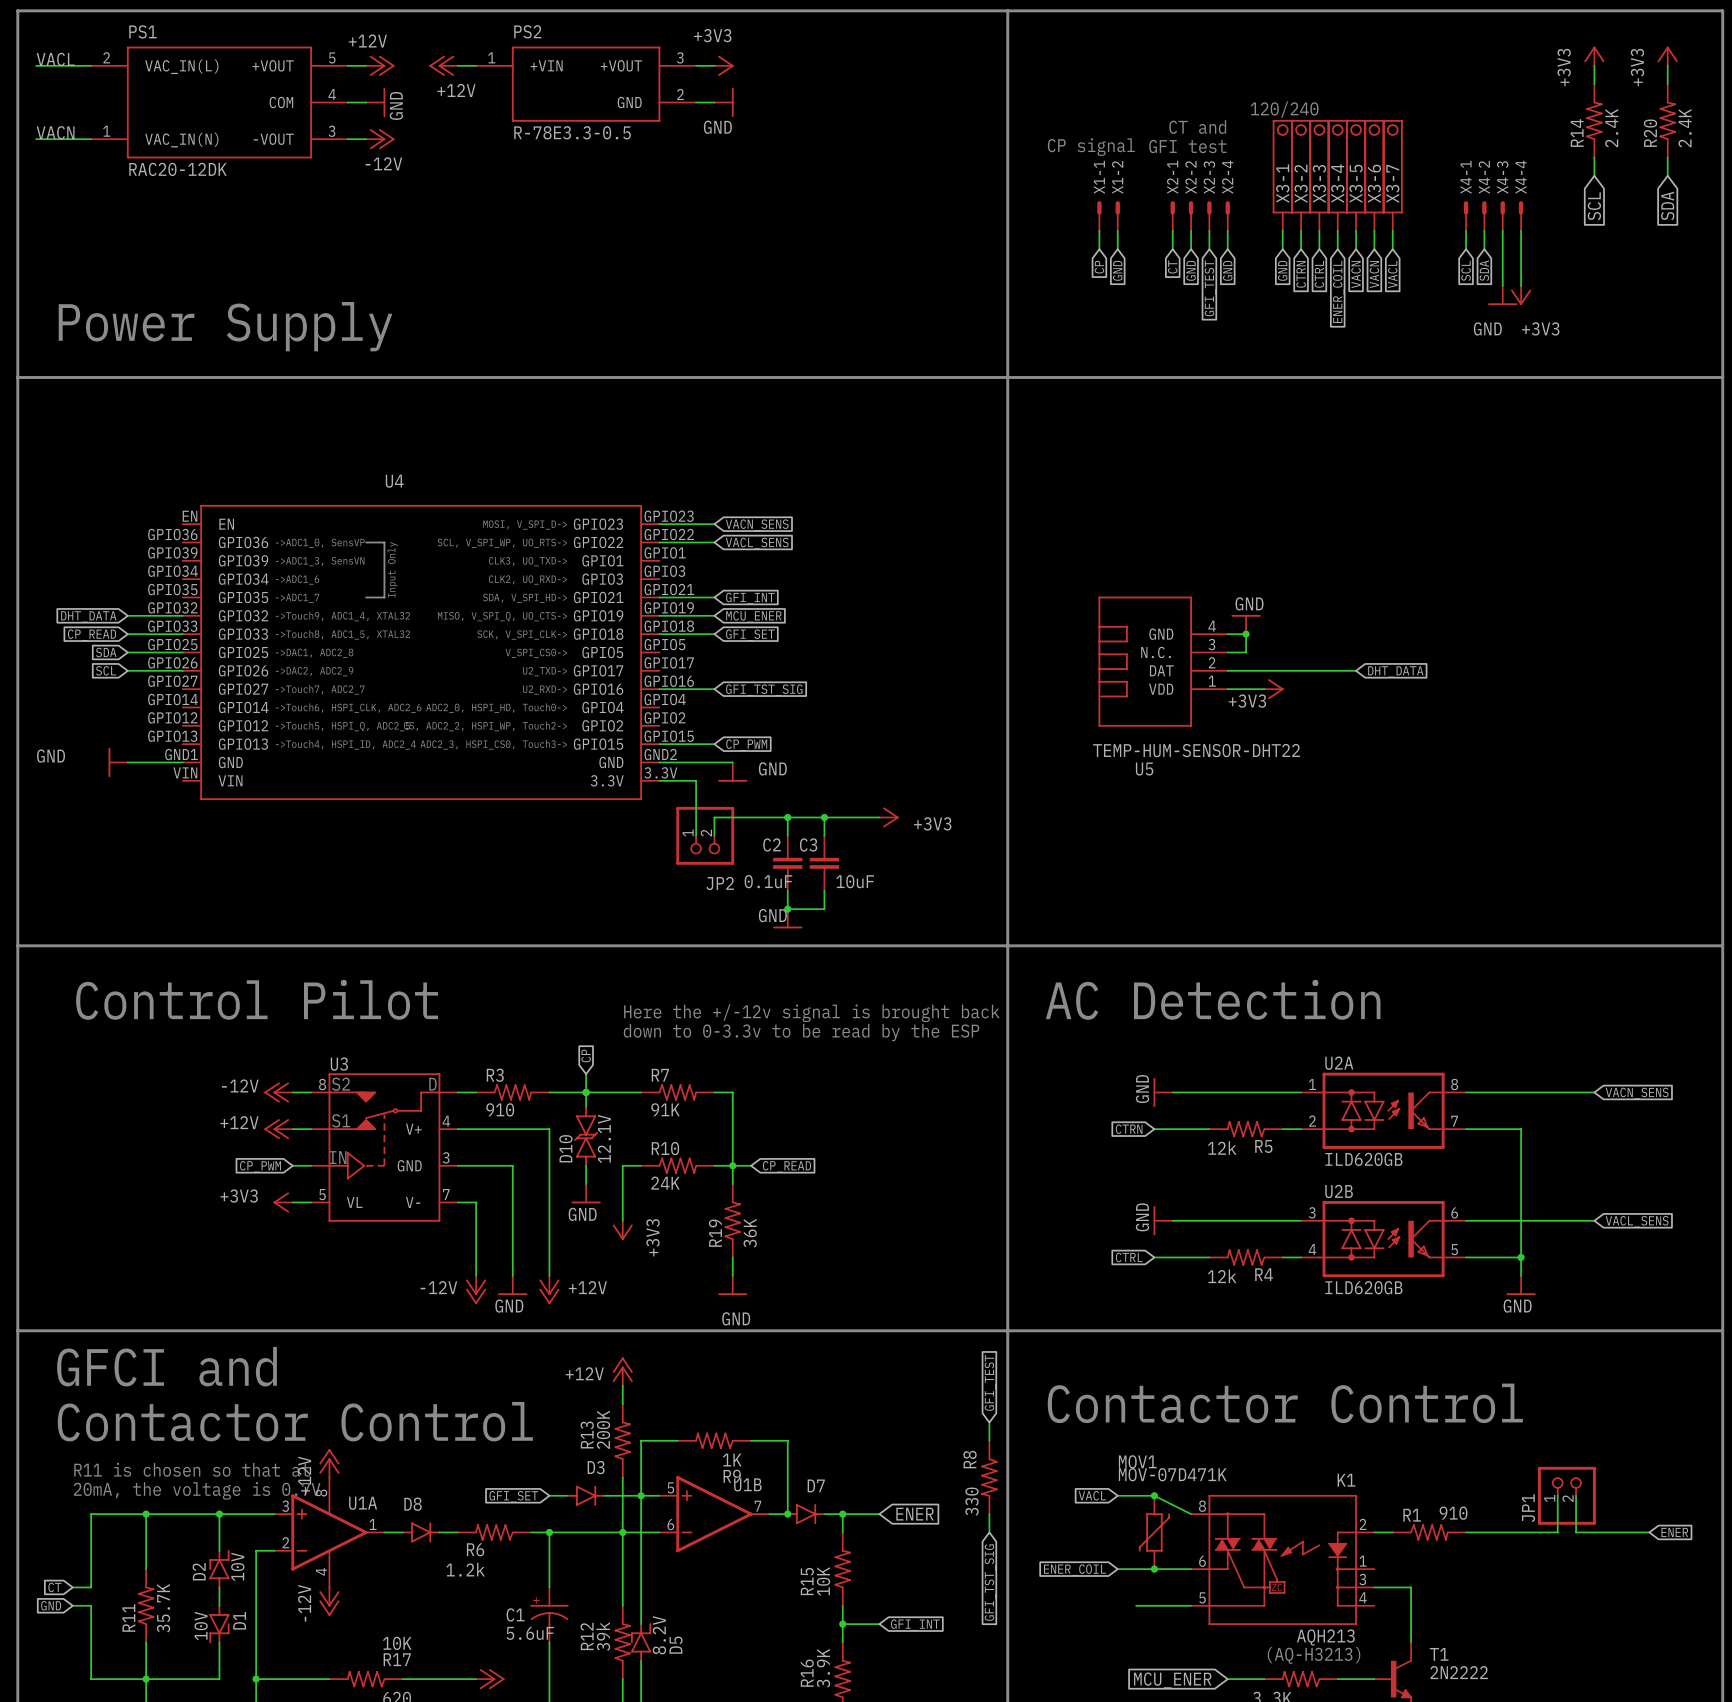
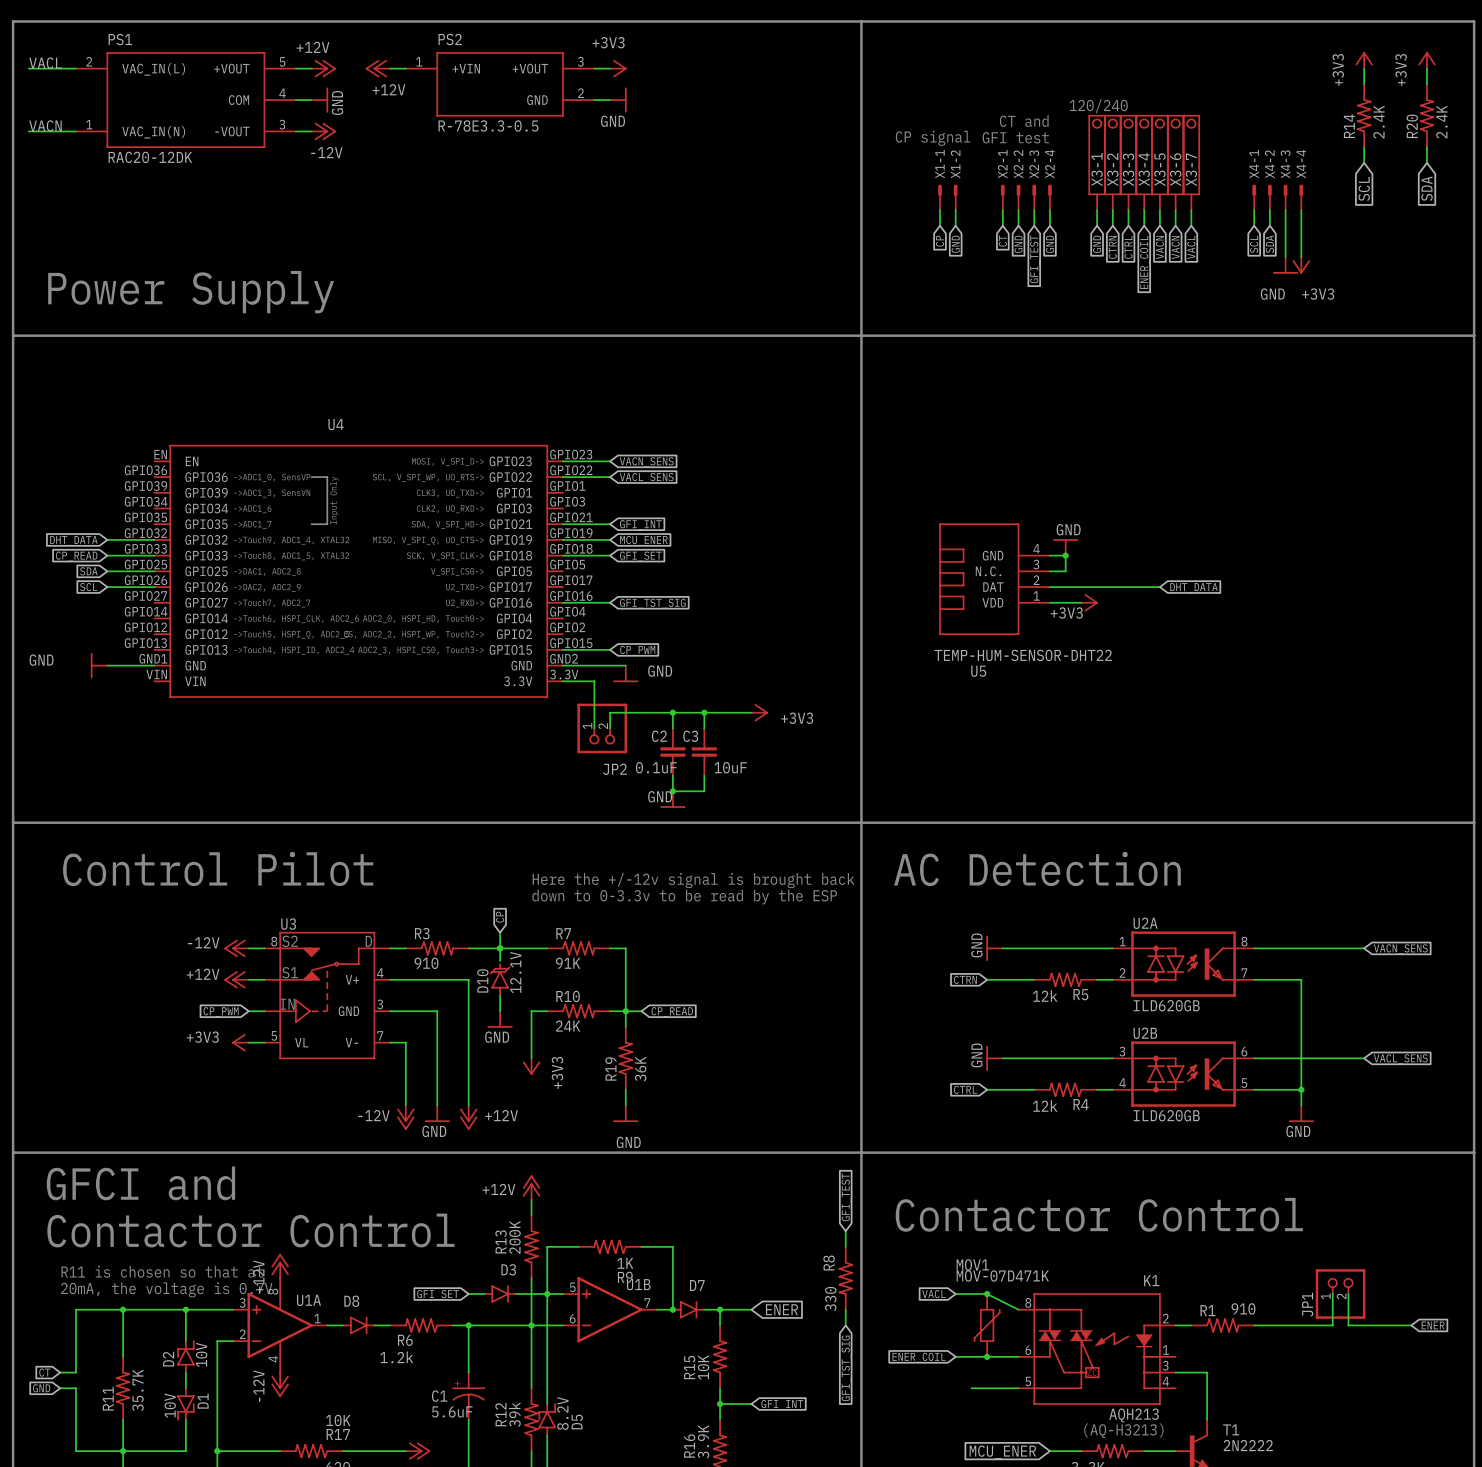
D10 symbol: [574, 1106, 599, 1167] -> [489, 963, 511, 997]
power symbol position: GND (586, 1193) -> GND (500, 1019)

